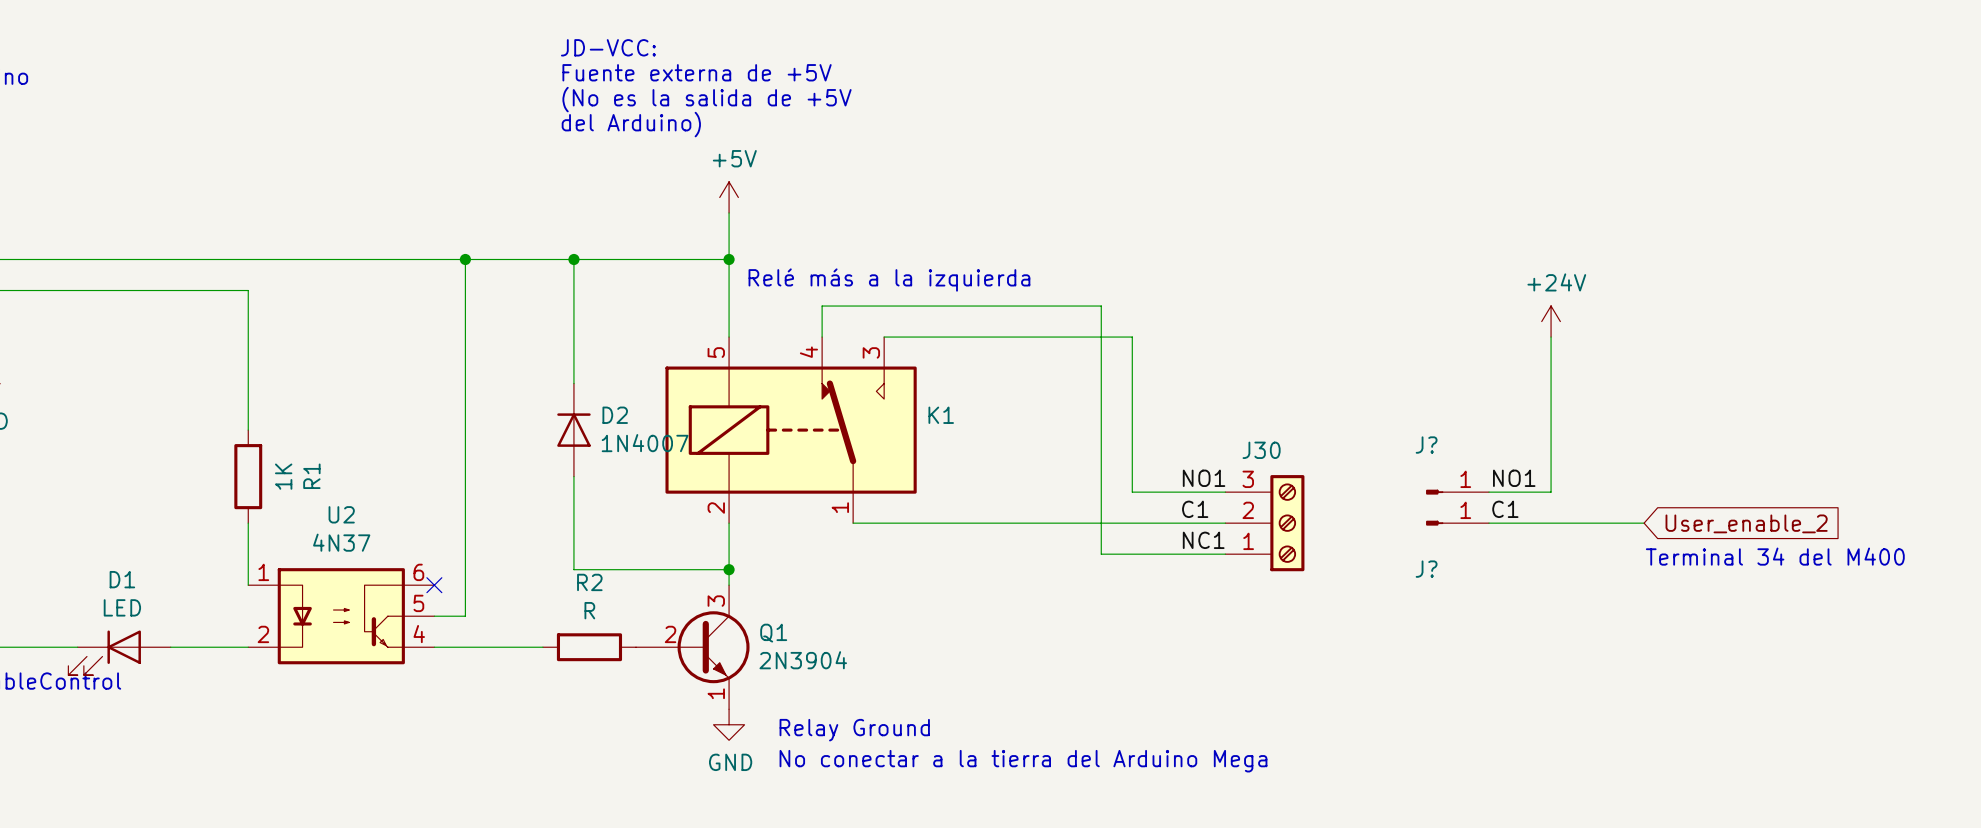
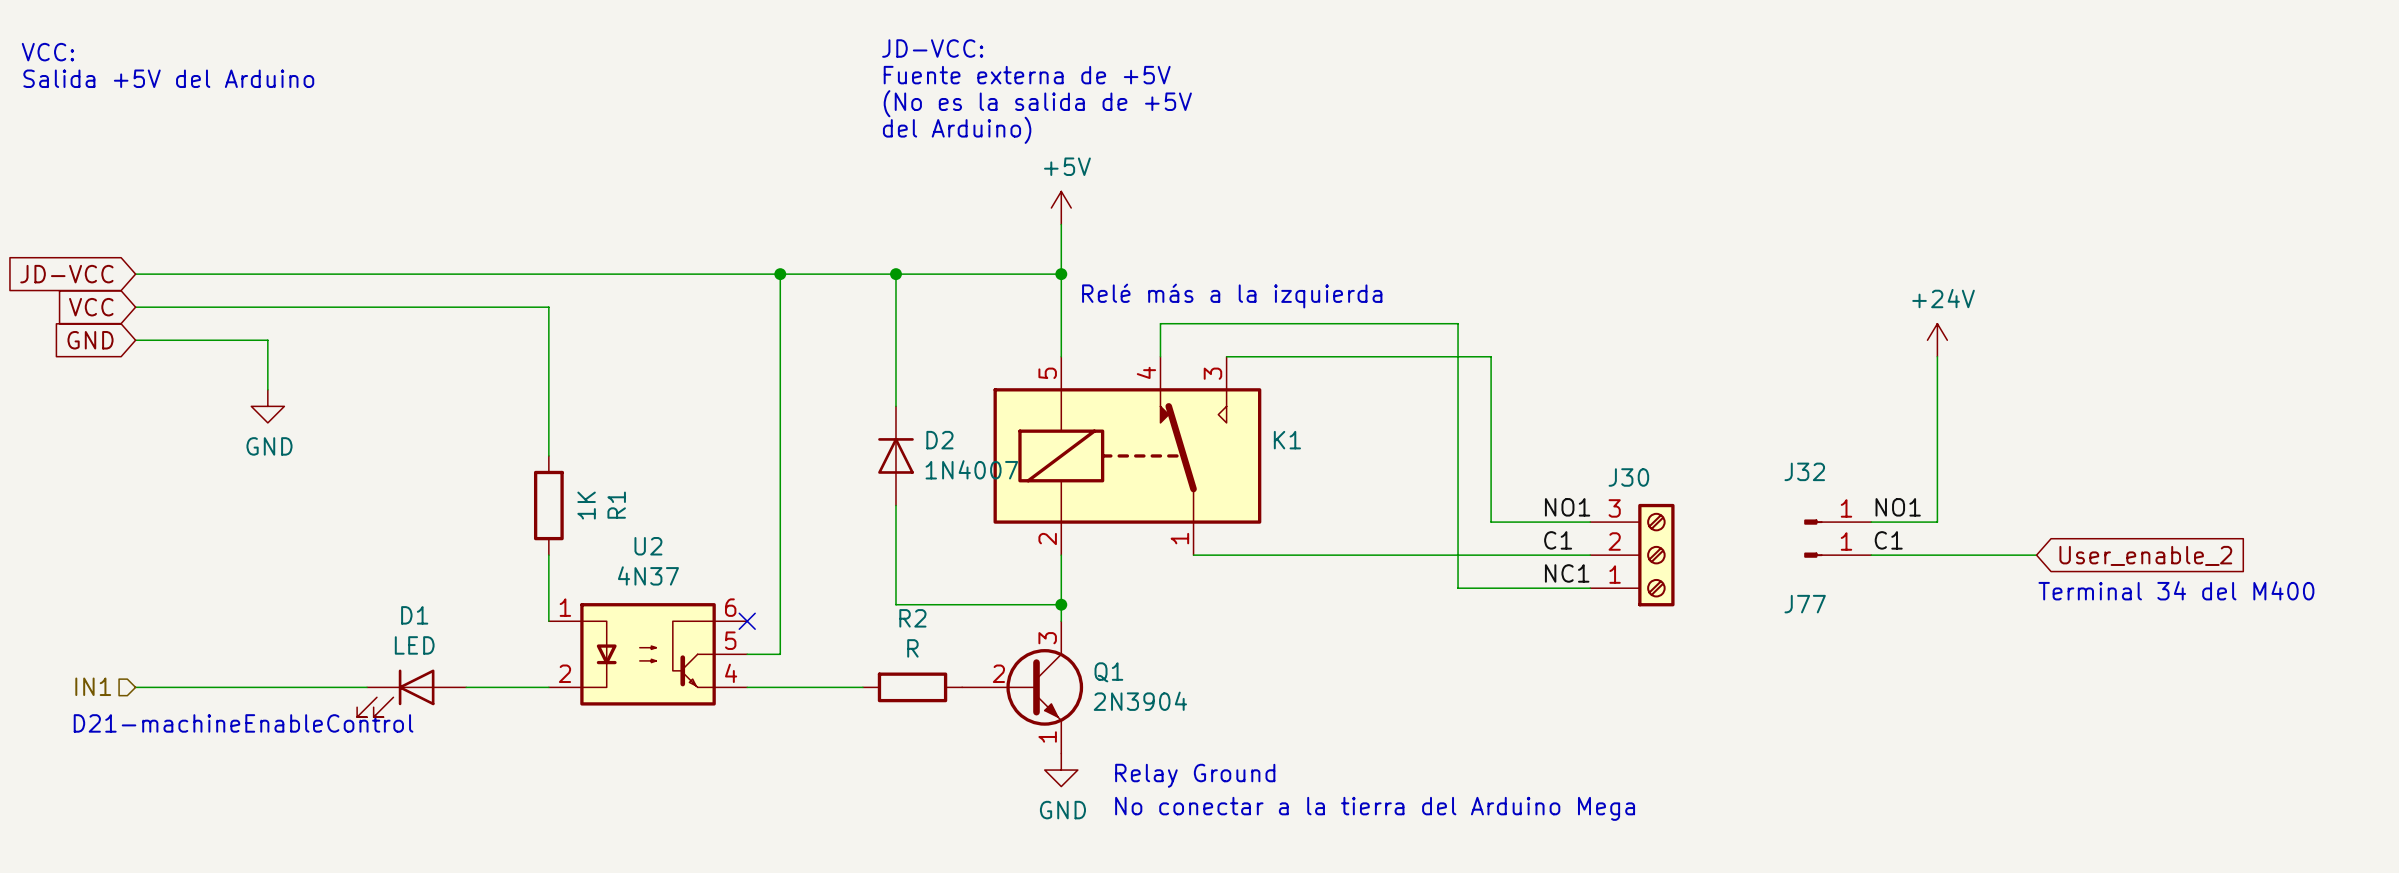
J? name: J? (1426, 445) -> J32 (1804, 471)
J? name: J? (1426, 569) -> J77 (1805, 604)

